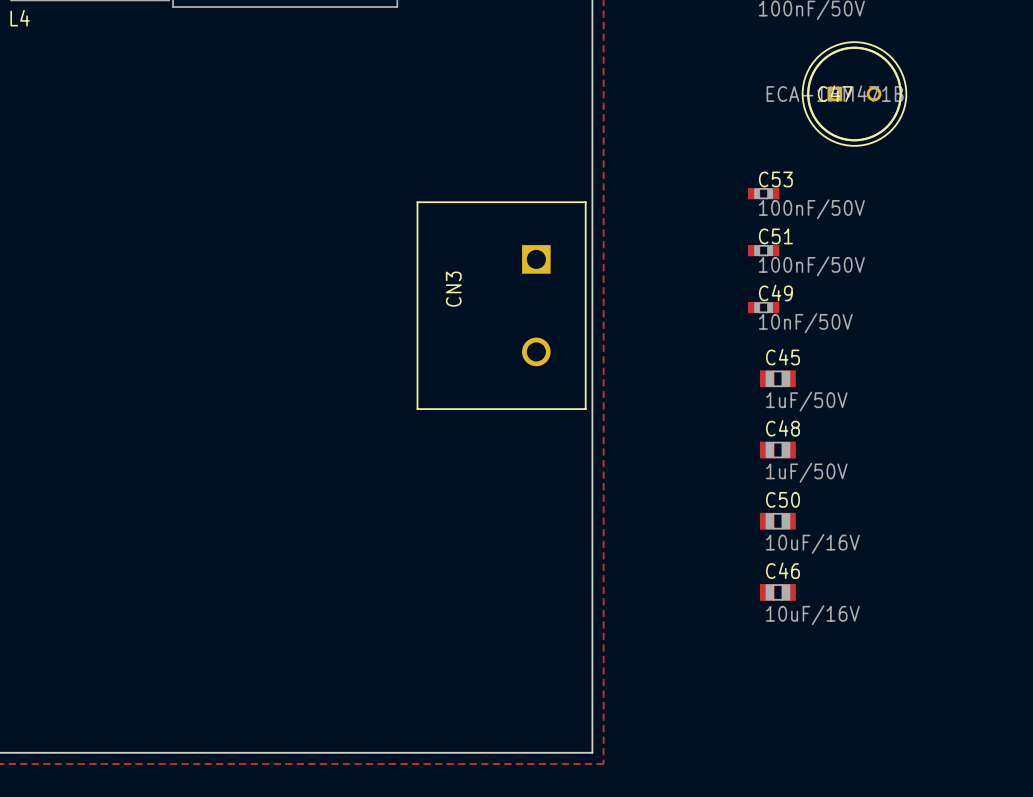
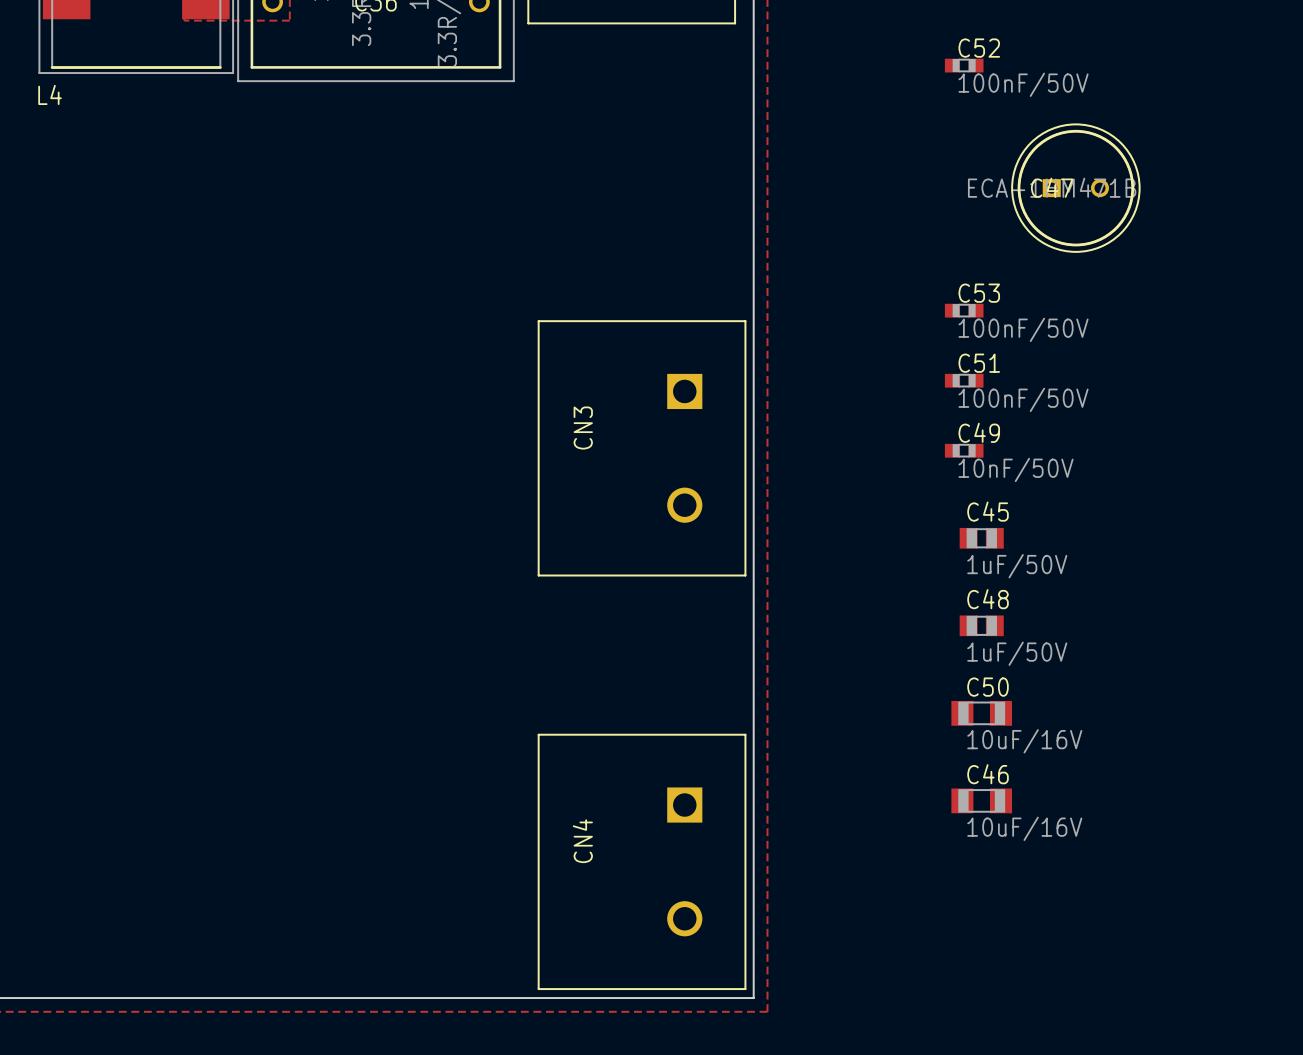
C50 footprint: [759, 512, 796, 530] -> [951, 700, 1013, 726]
C46 footprint: [759, 584, 796, 601] -> [951, 788, 1013, 814]
CN4: none -> (642, 861)

